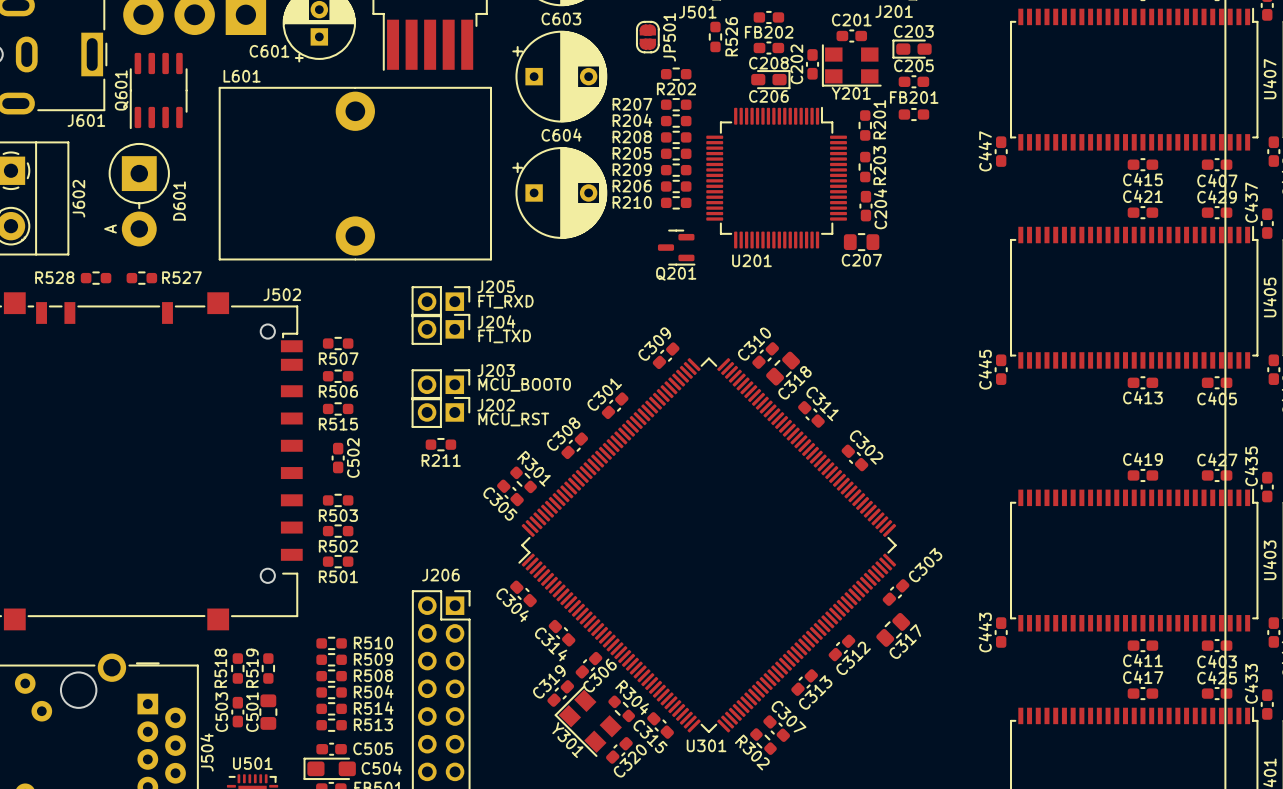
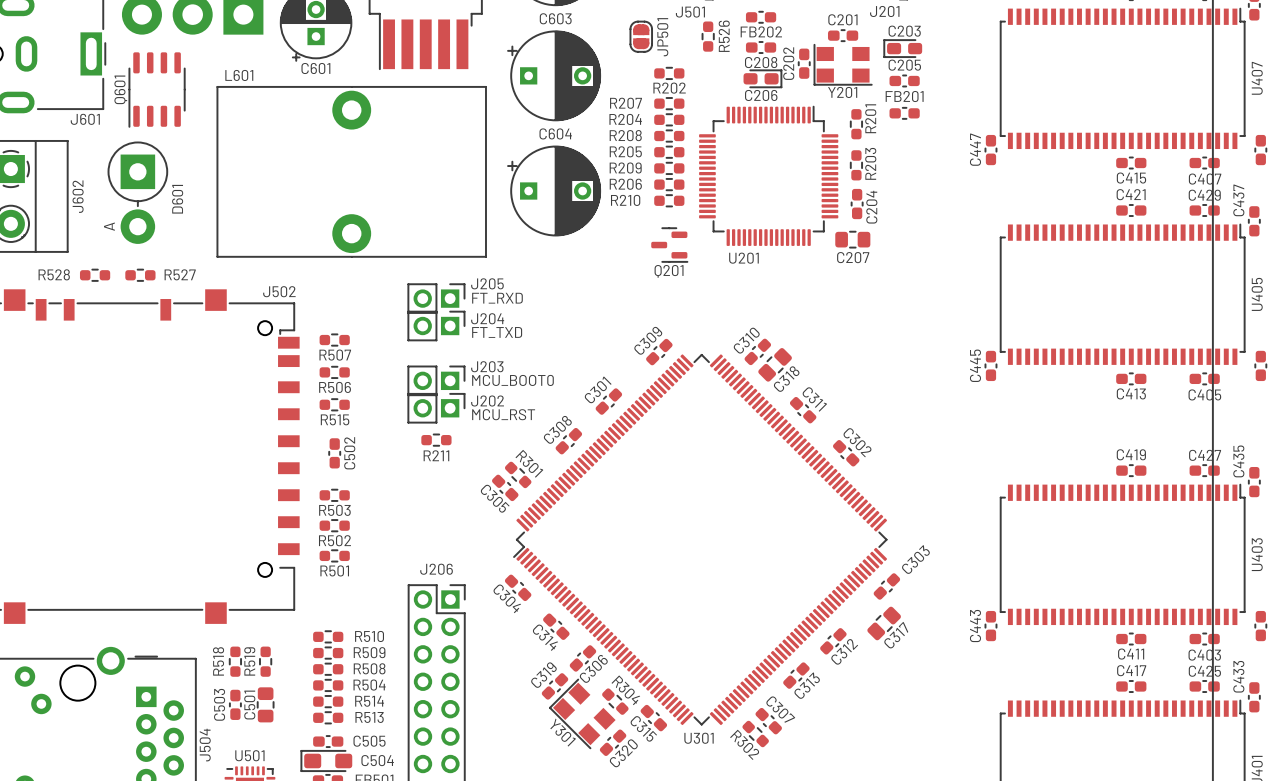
C601 name position: C601 (269, 51) -> C601 (315, 68)

